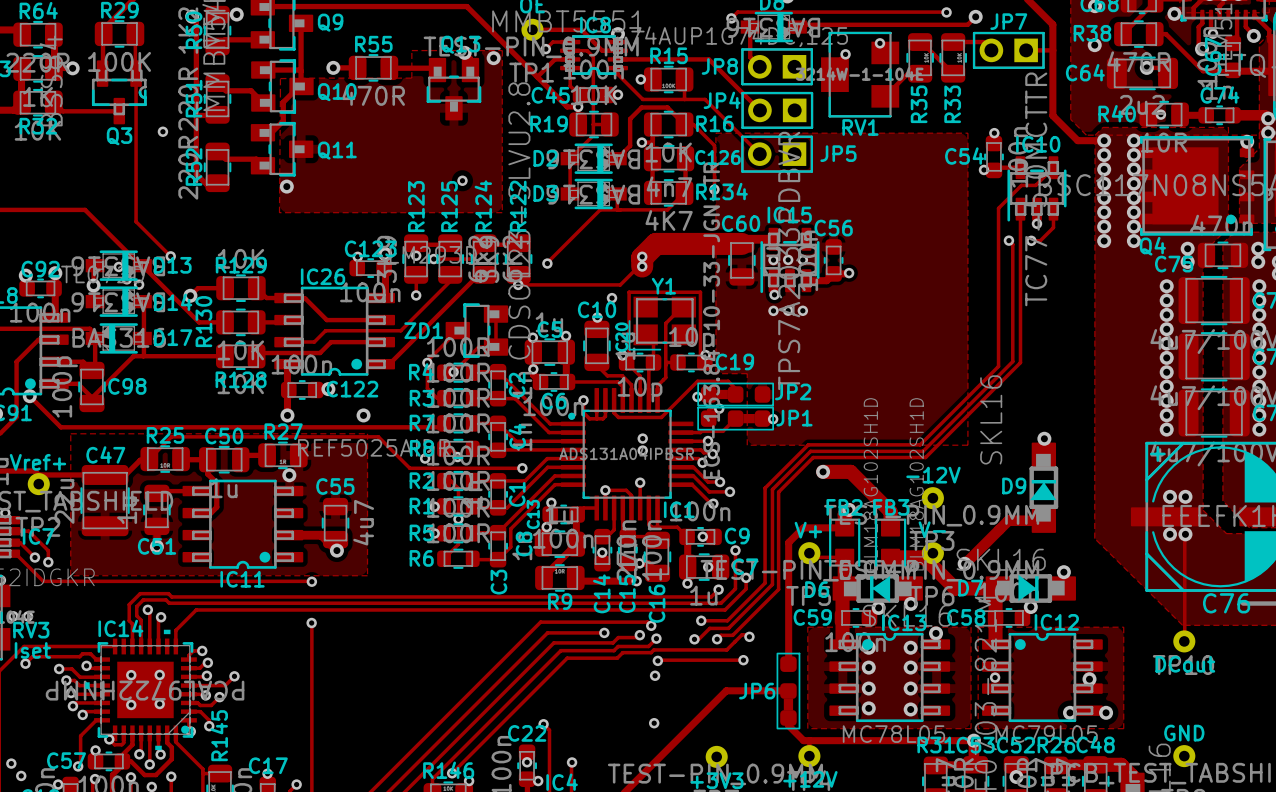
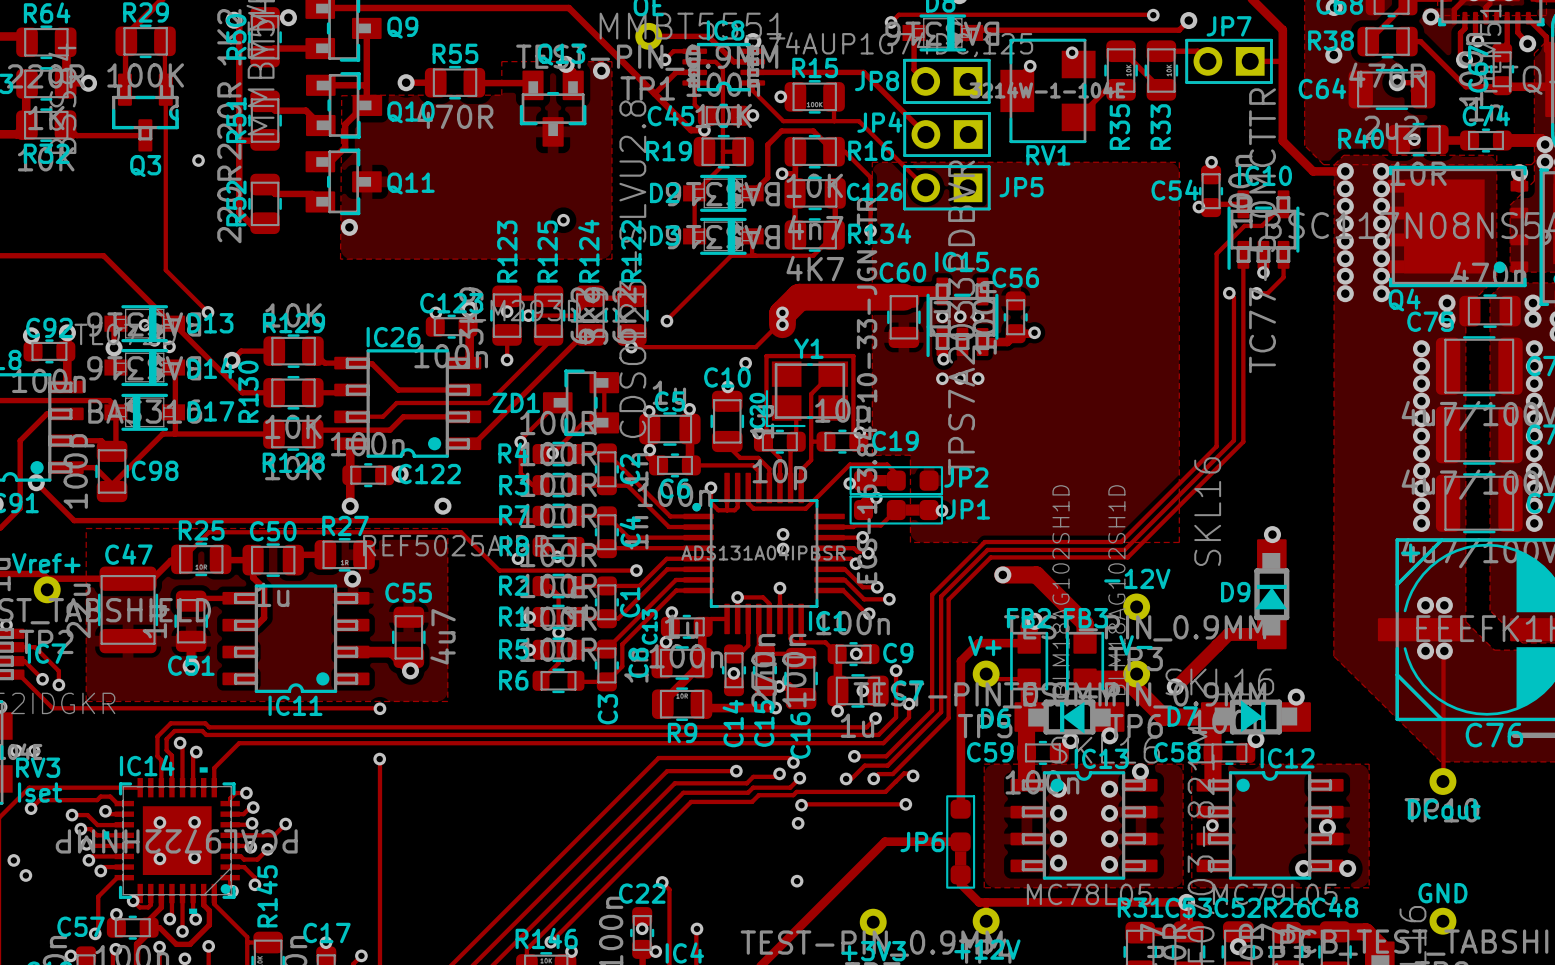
via: none -> (13, 860)
via: none -> (25, 875)
via: (11, 763) -> none
via: (21, 775) -> none

